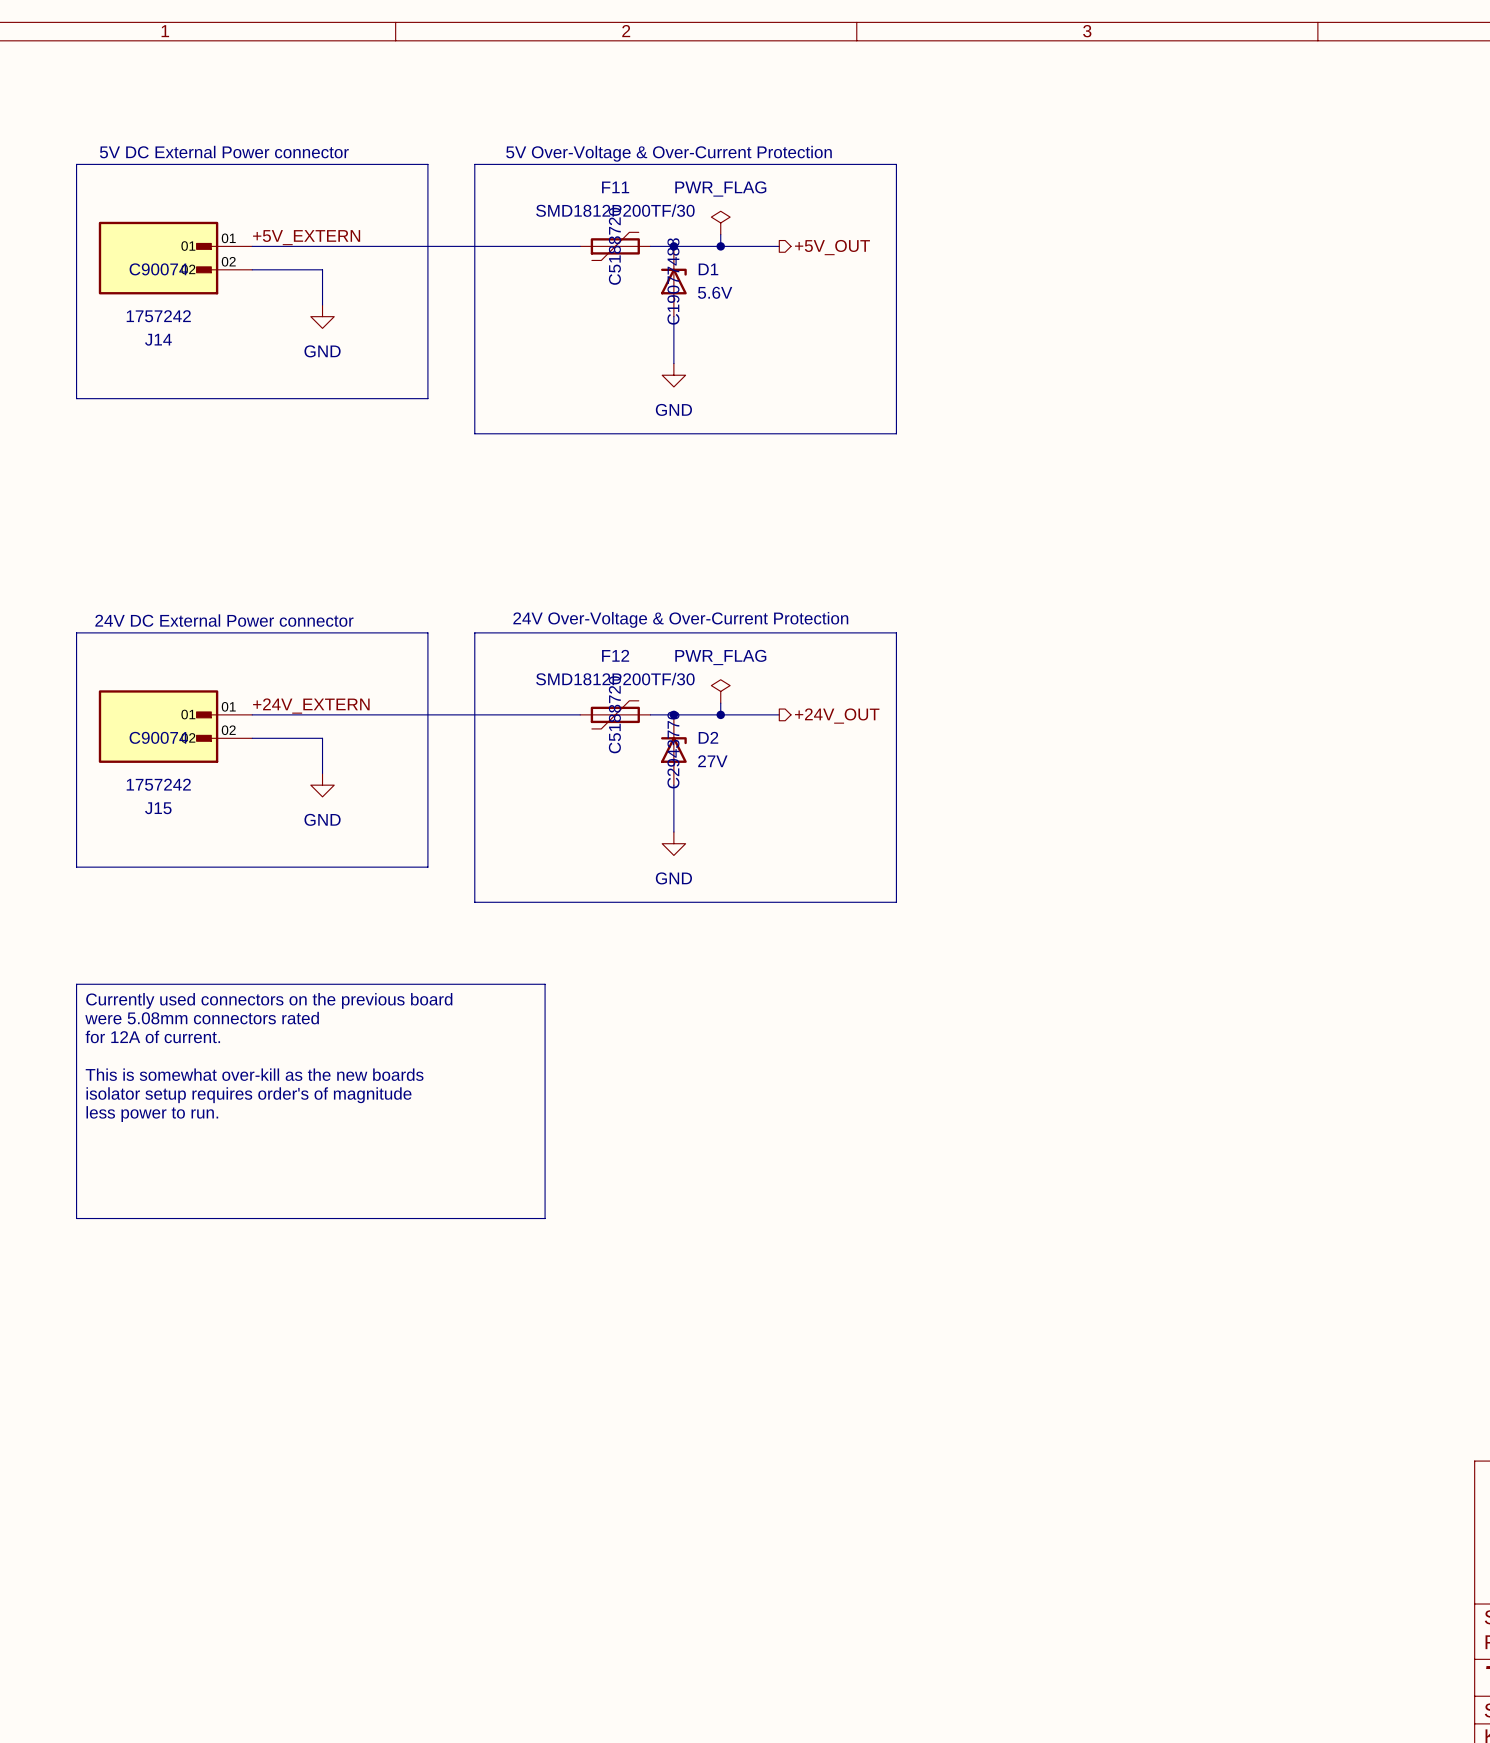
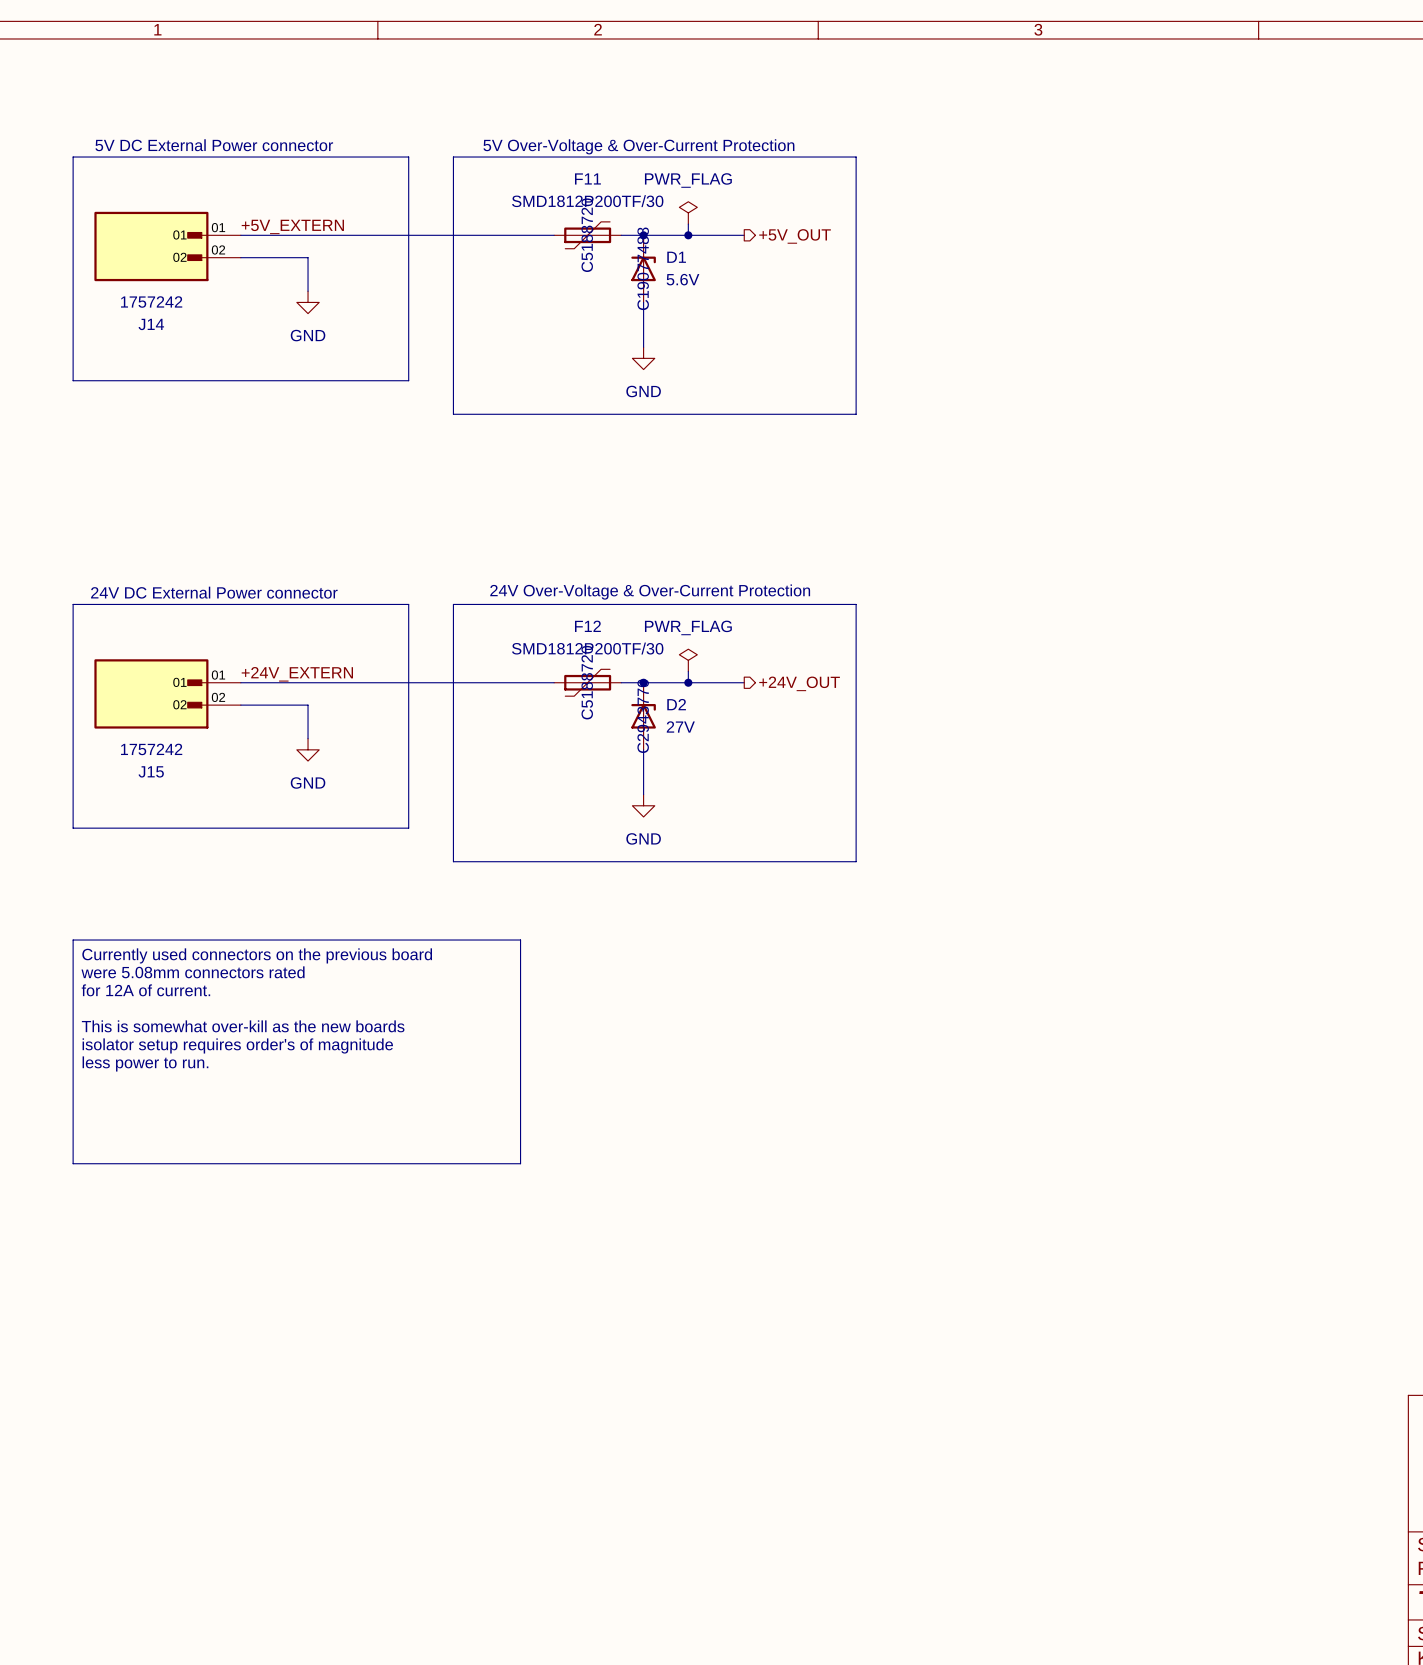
J14 text: C90074 (158, 269) -> none
J15 text: C90074 (158, 737) -> none

